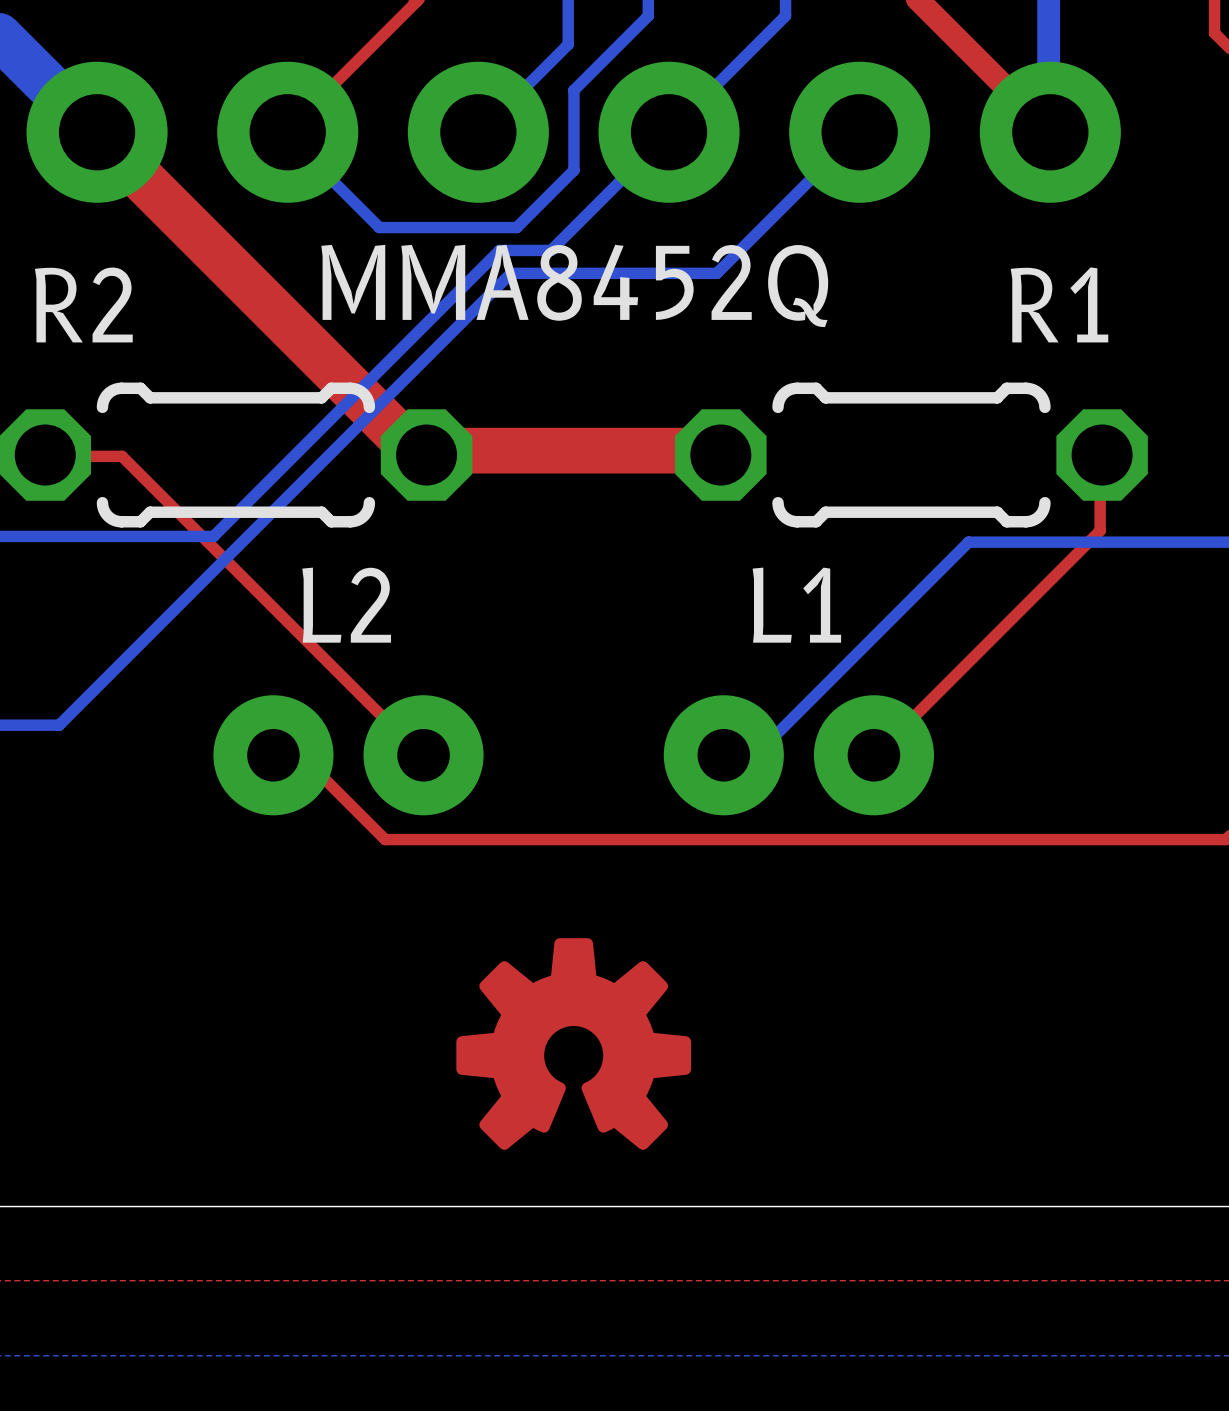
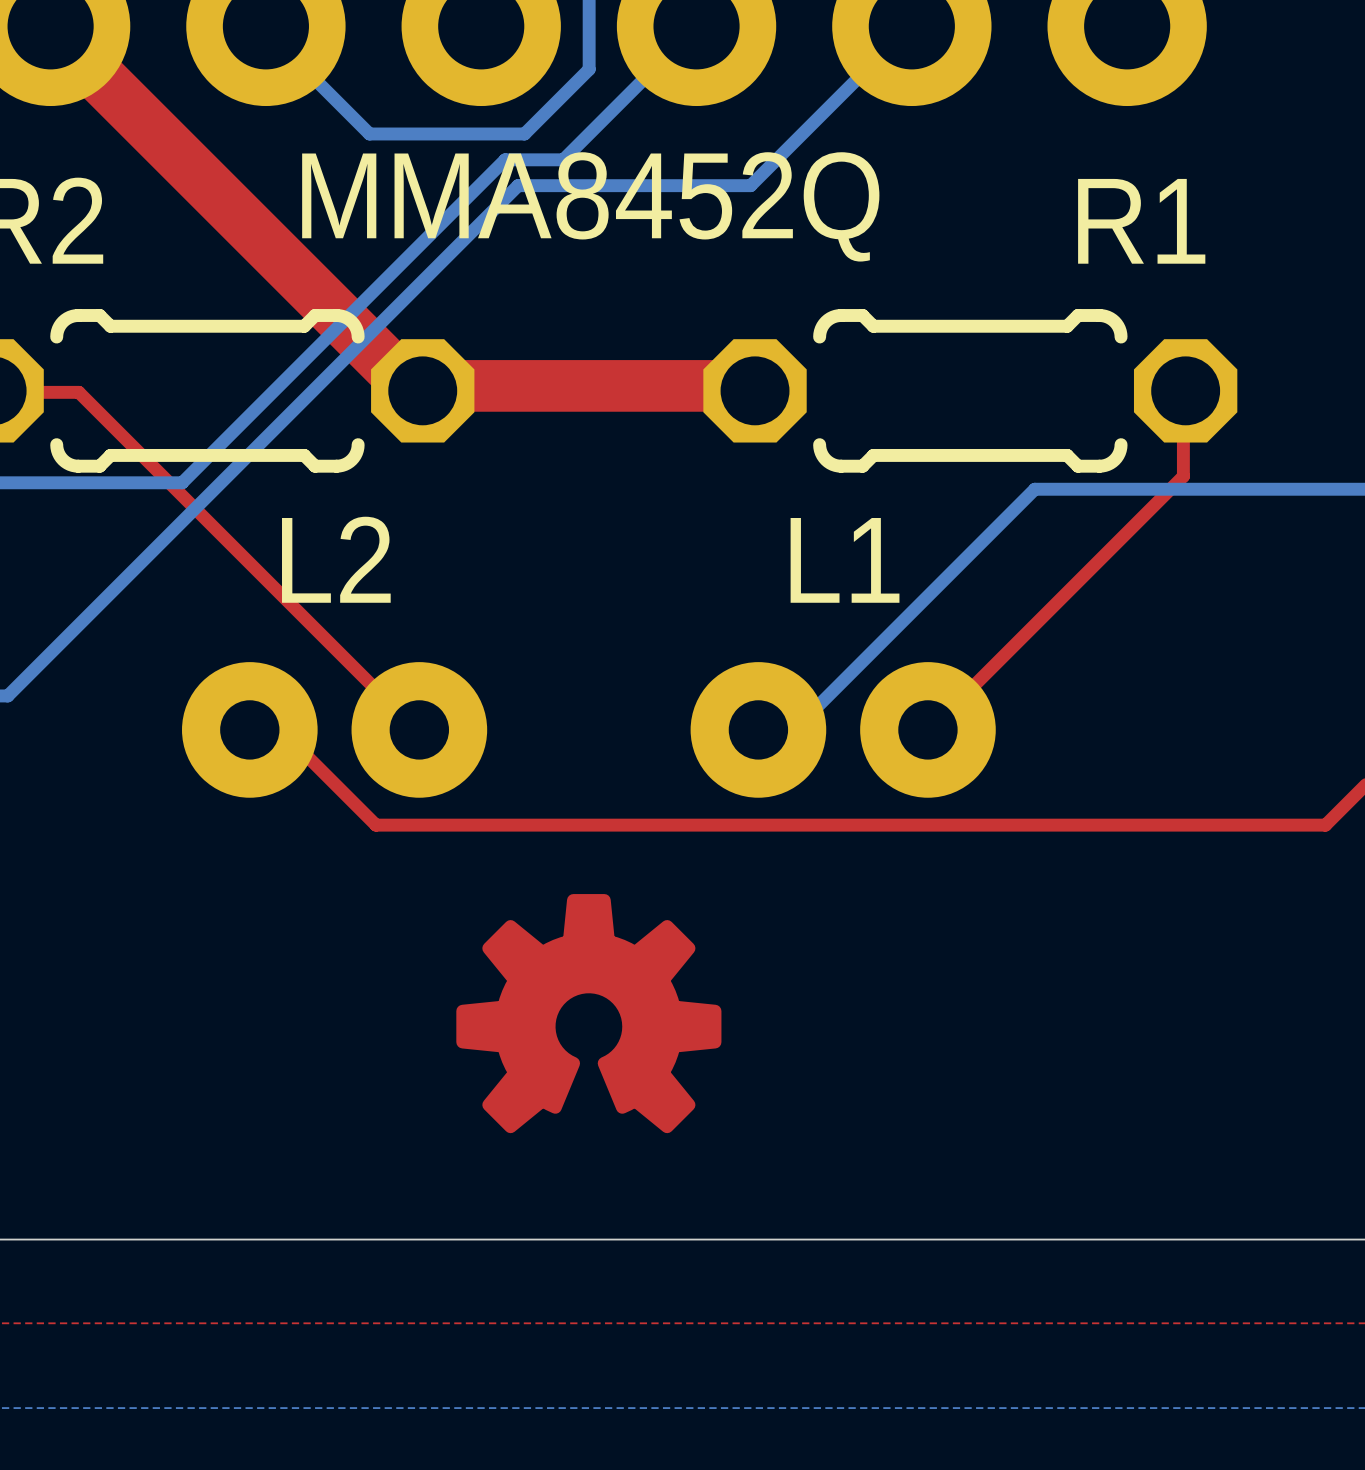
drawing position: (573, 1044) -> (588, 1013)

